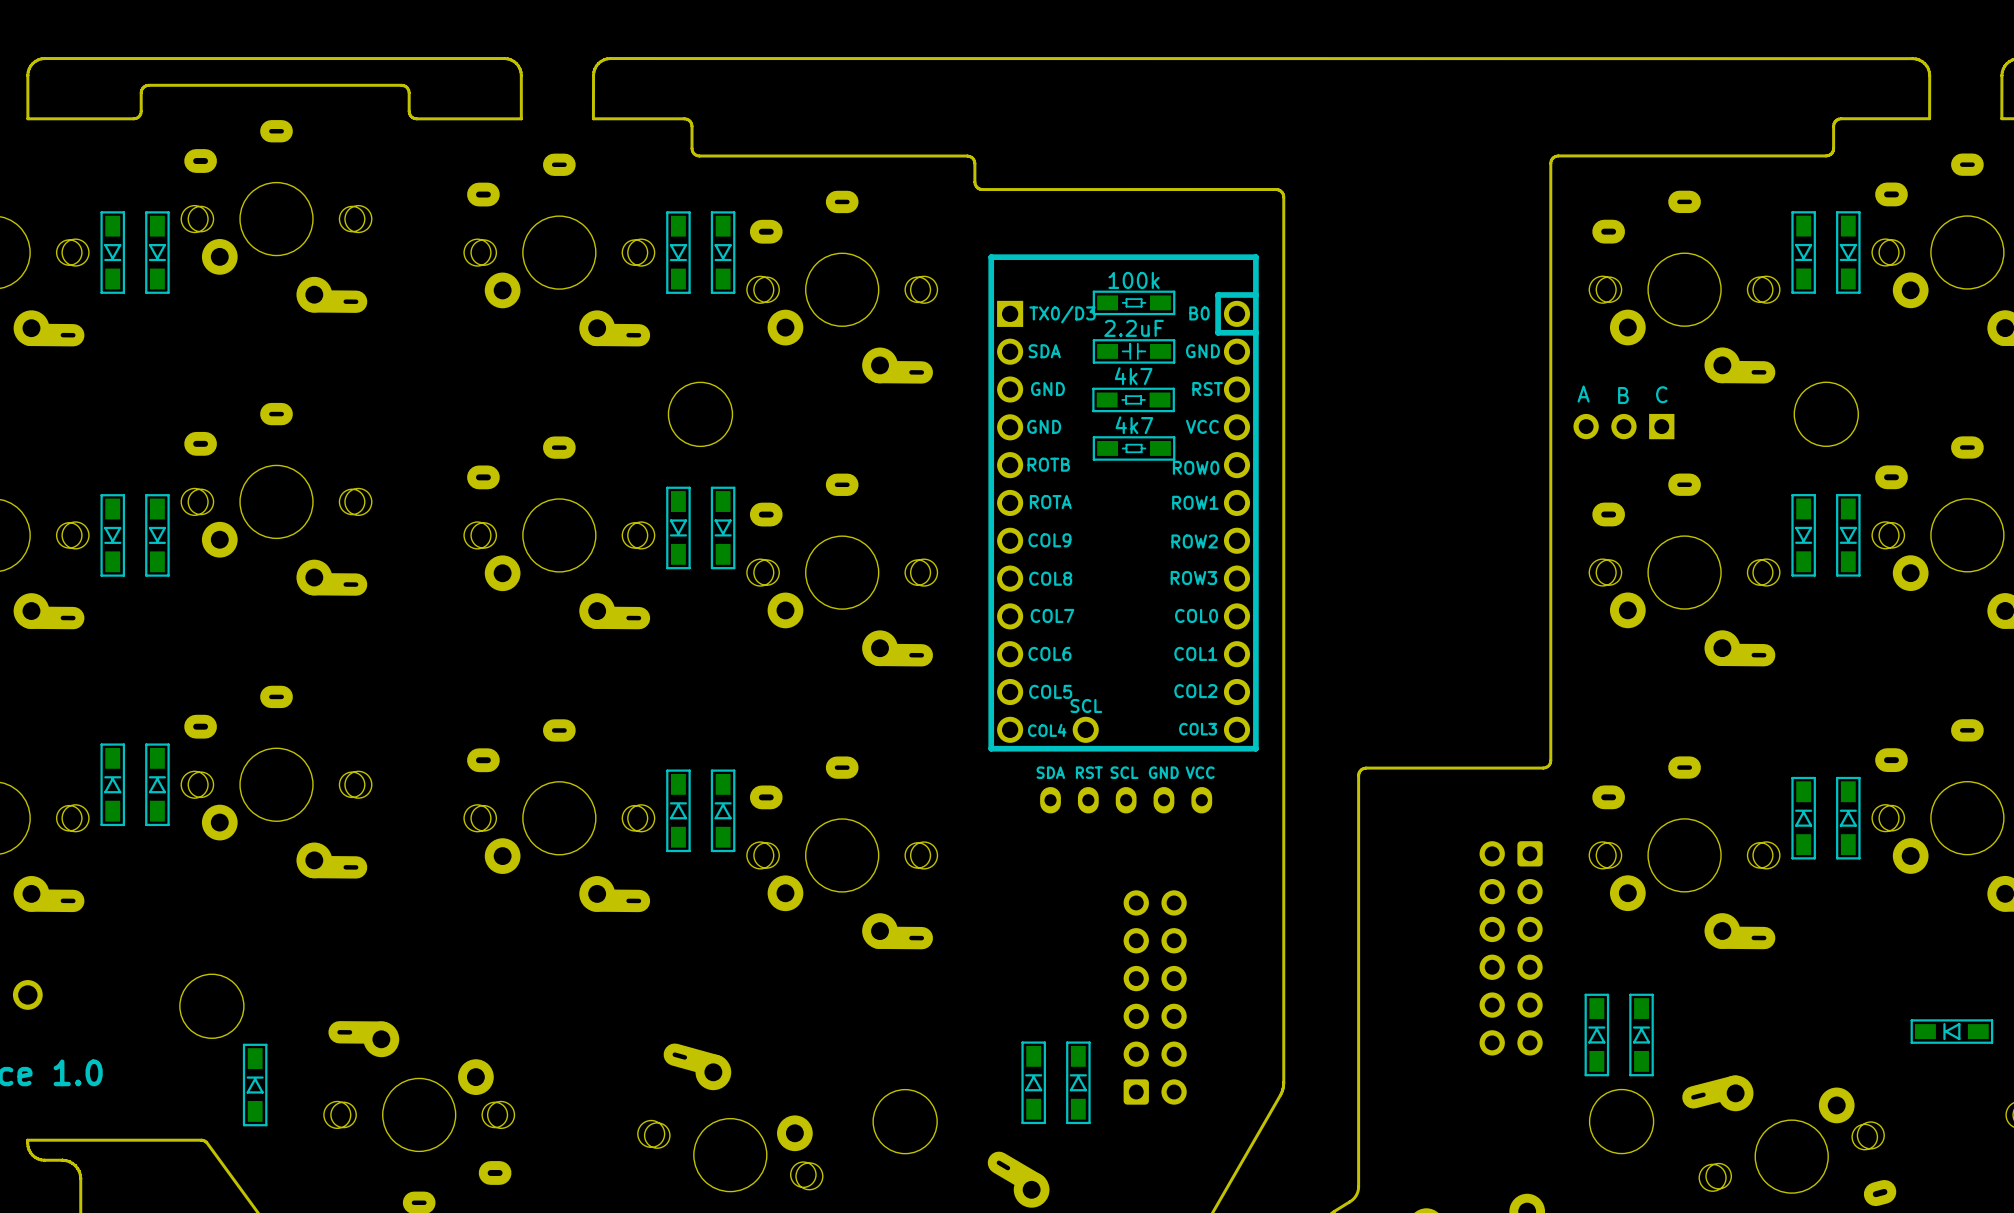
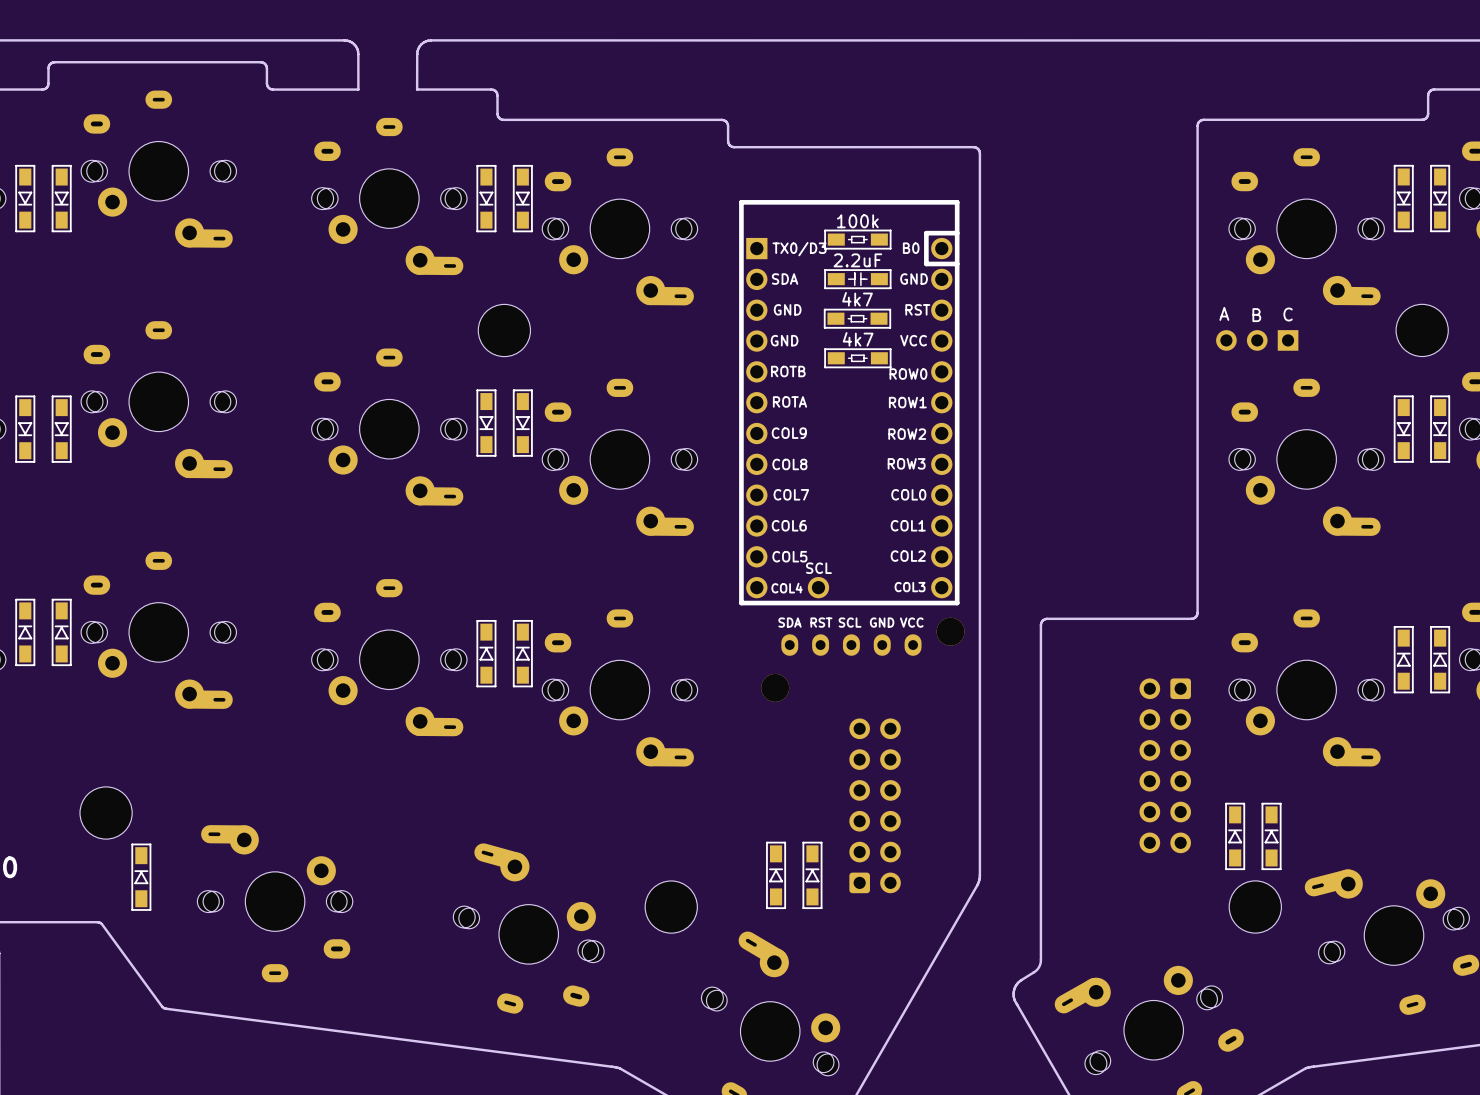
part: none -> (950, 631)
part: none -> (775, 687)

